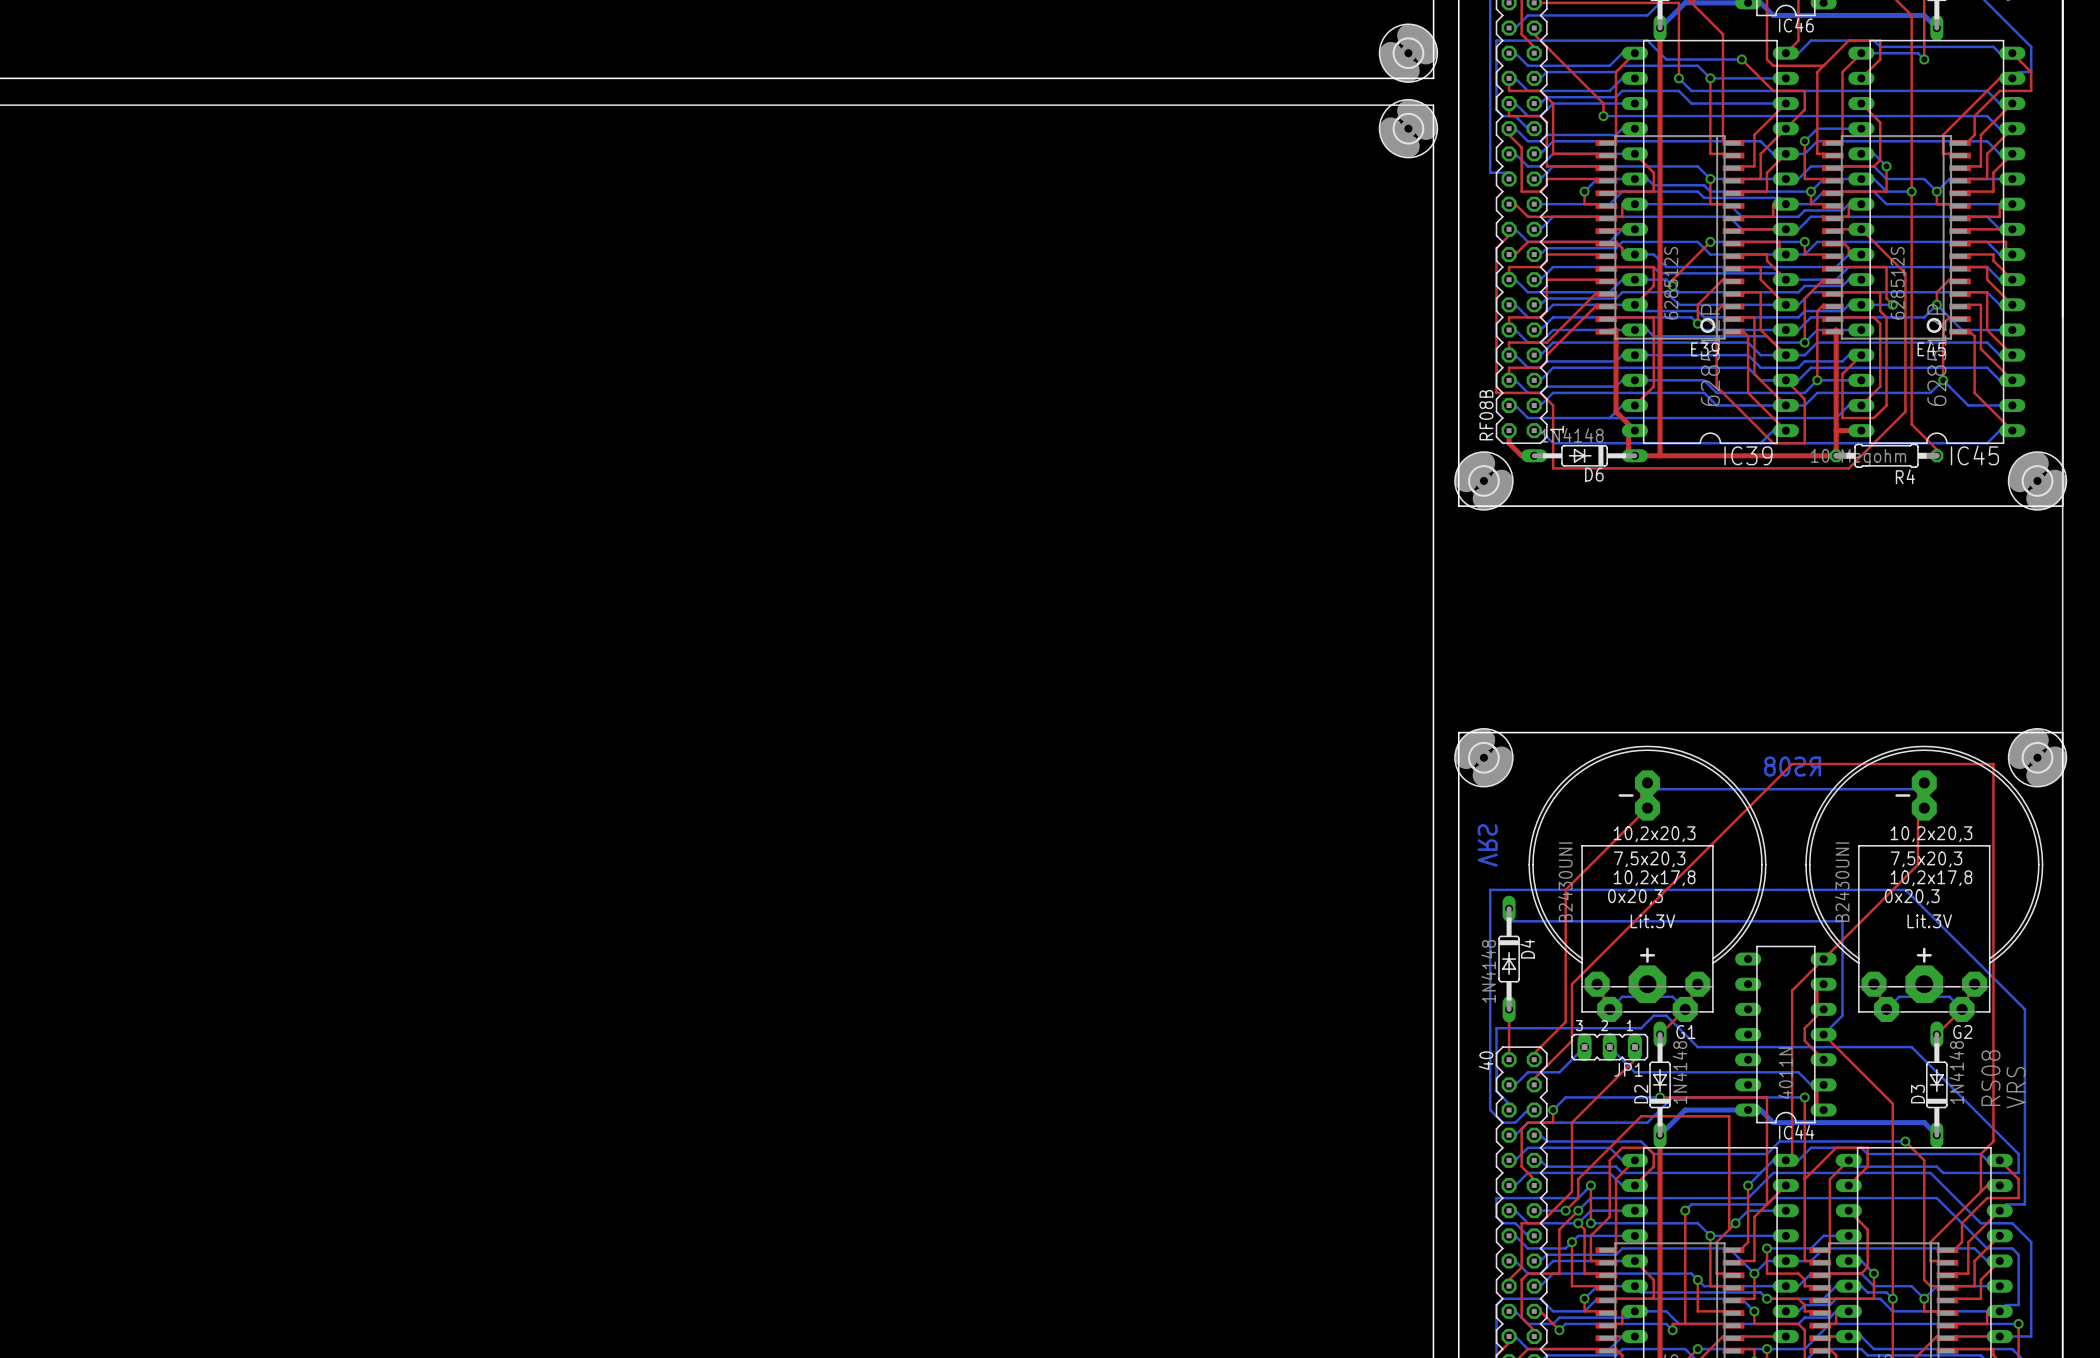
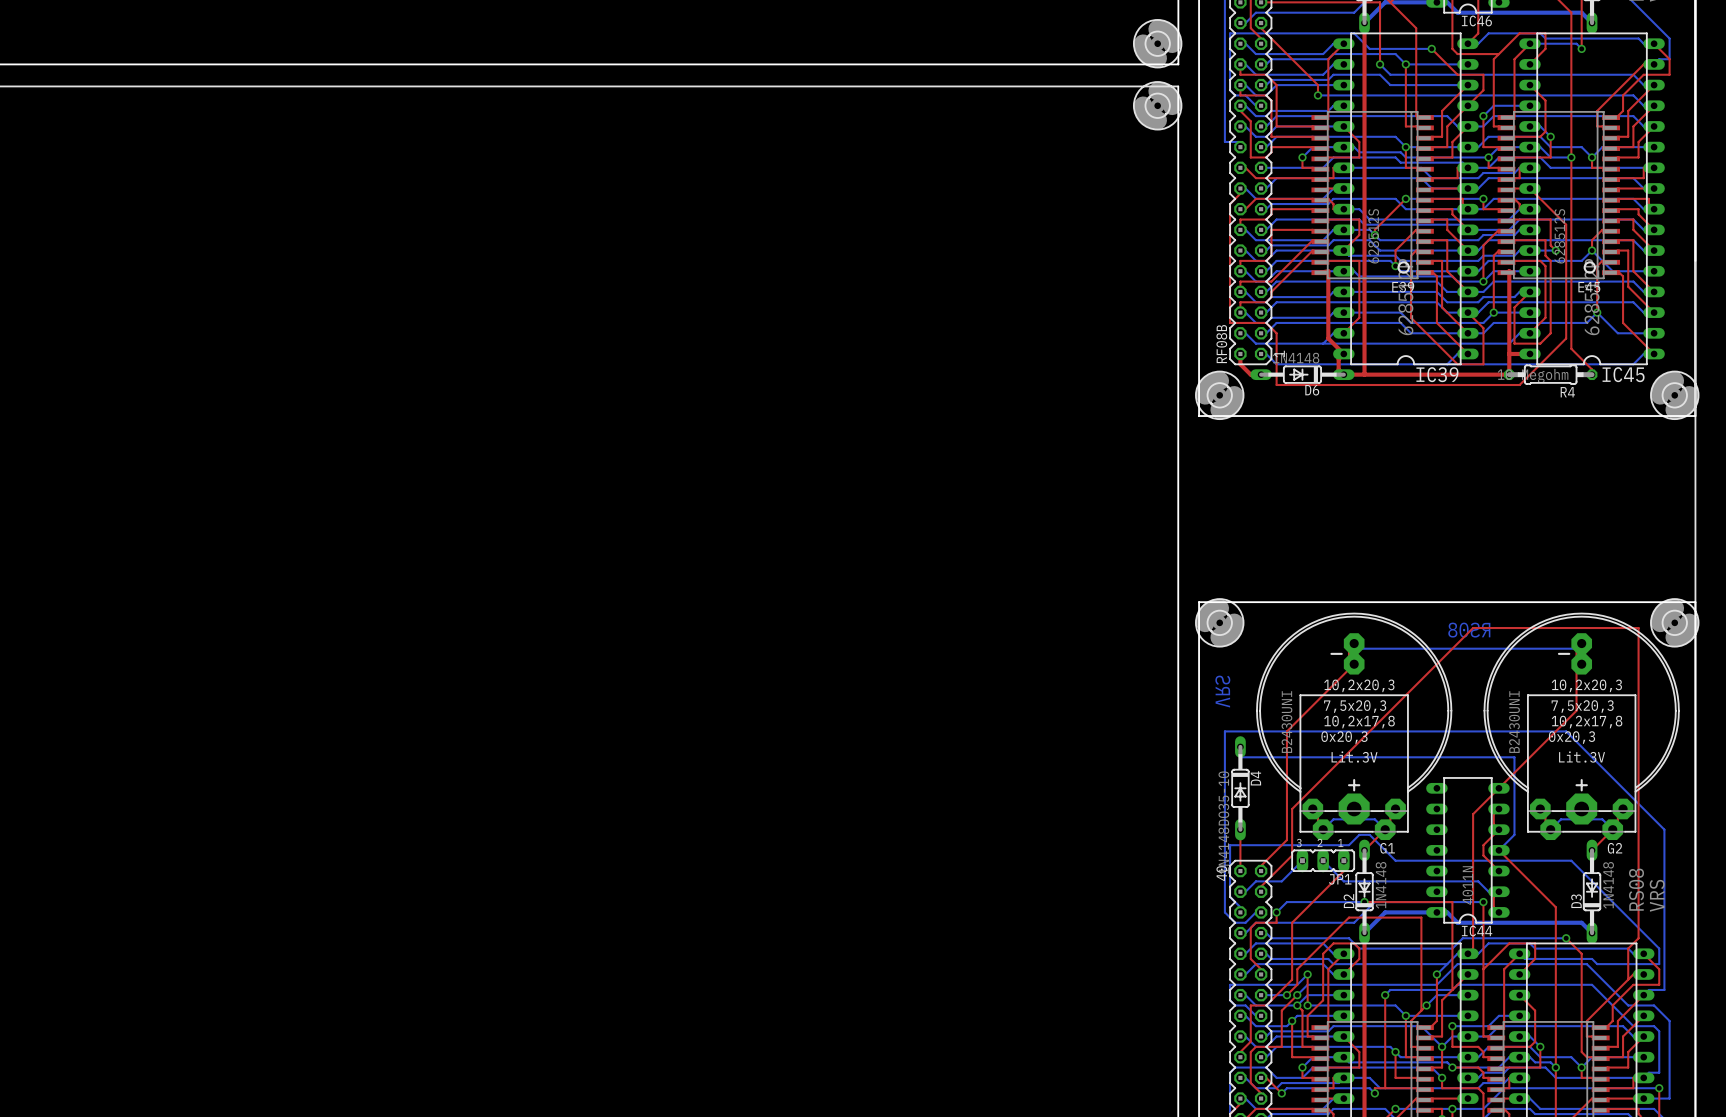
D4 value: 1N4148 (1488, 971) -> 1N4148DO35-10 (1223, 822)

